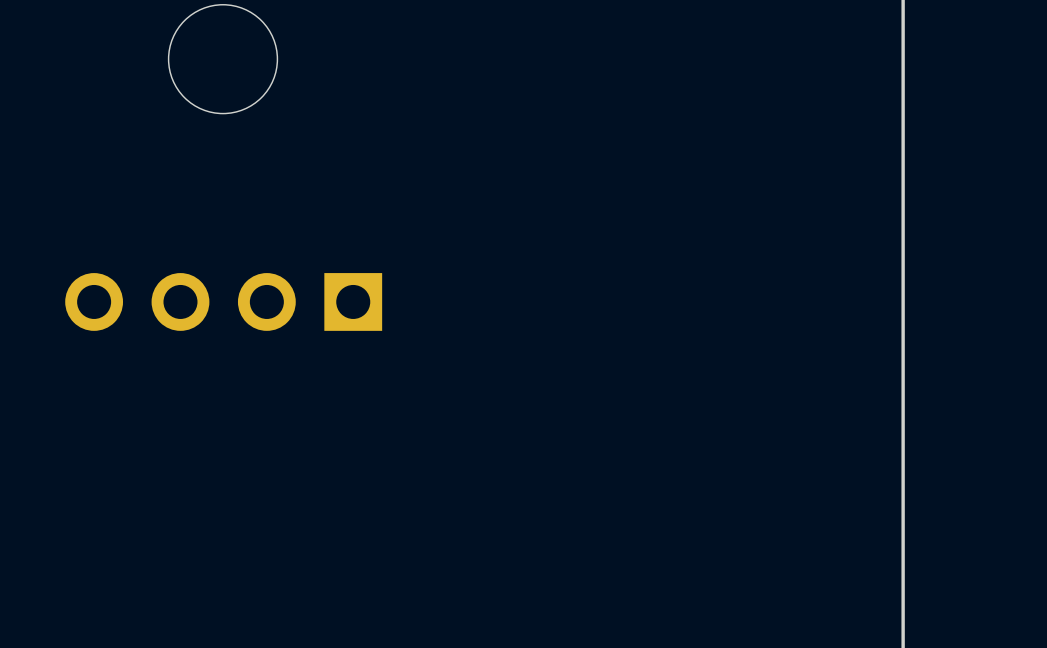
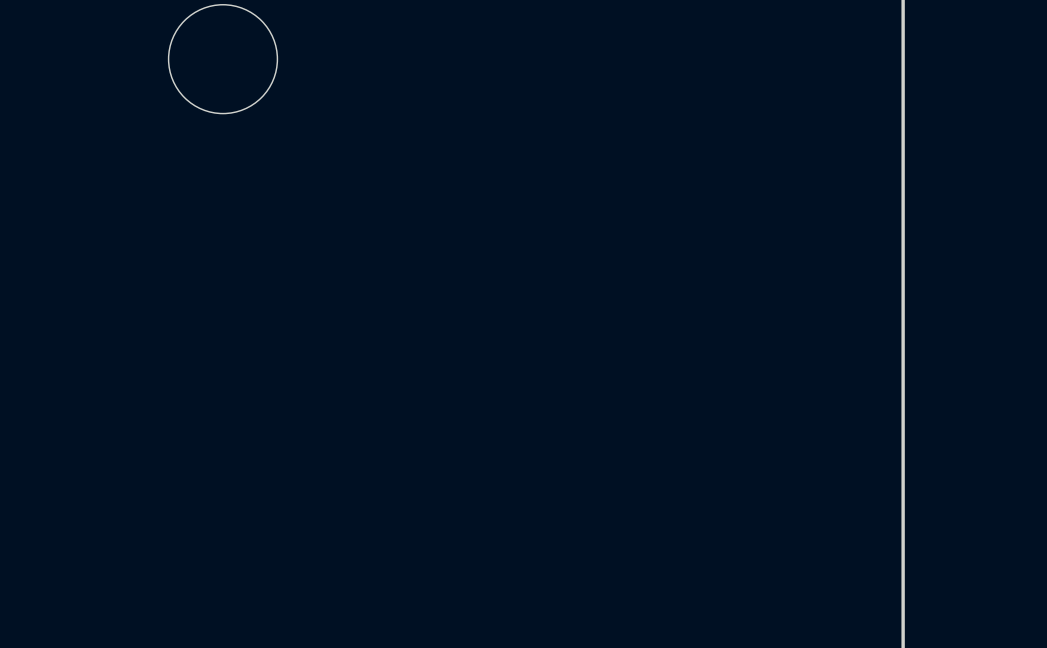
part: (223, 301) -> none

